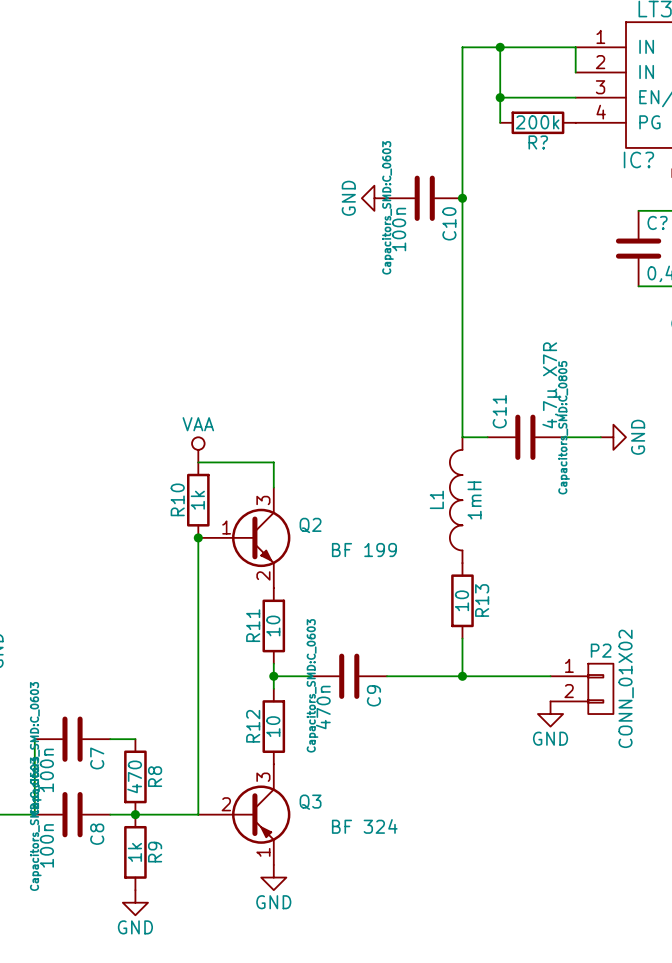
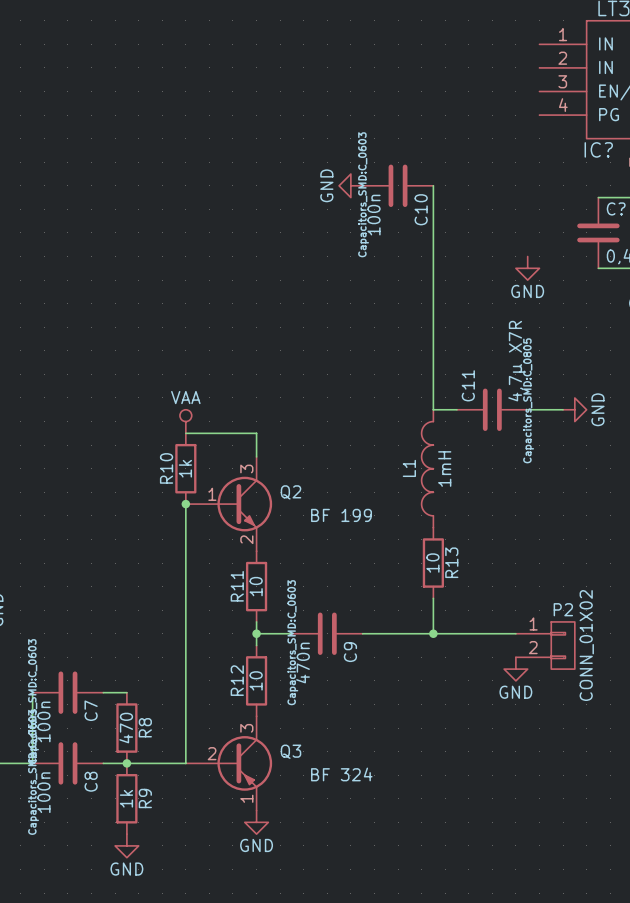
wire: (500, 47) (500, 122) -> none
junction: (500, 47) -> none
wire: (575, 72) (575, 47) (462, 47) (462, 198) -> none
wire: (500, 97) (575, 97) -> none
junction: (500, 97) -> none
R?: 200k (537, 122) -> none
junction: (462, 198) -> none
power symbol: none -> GND (527, 268)

